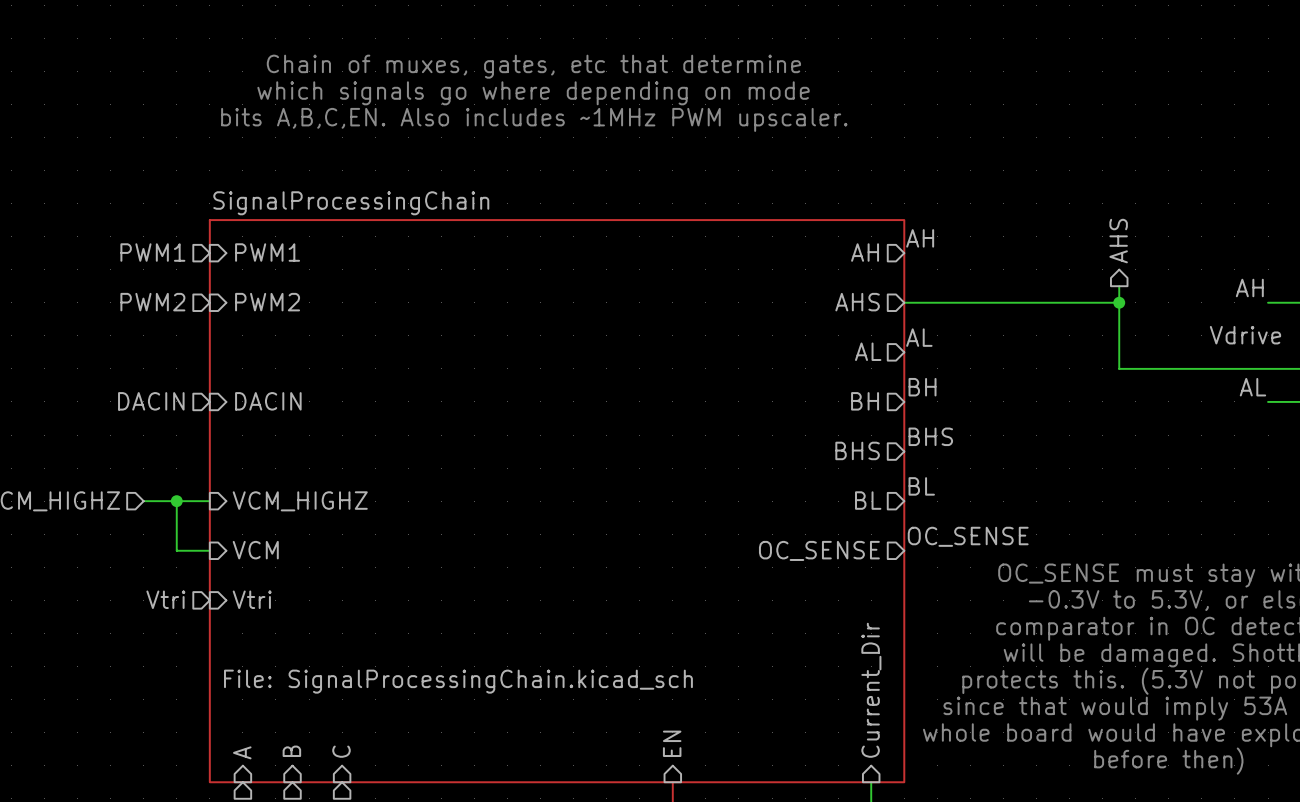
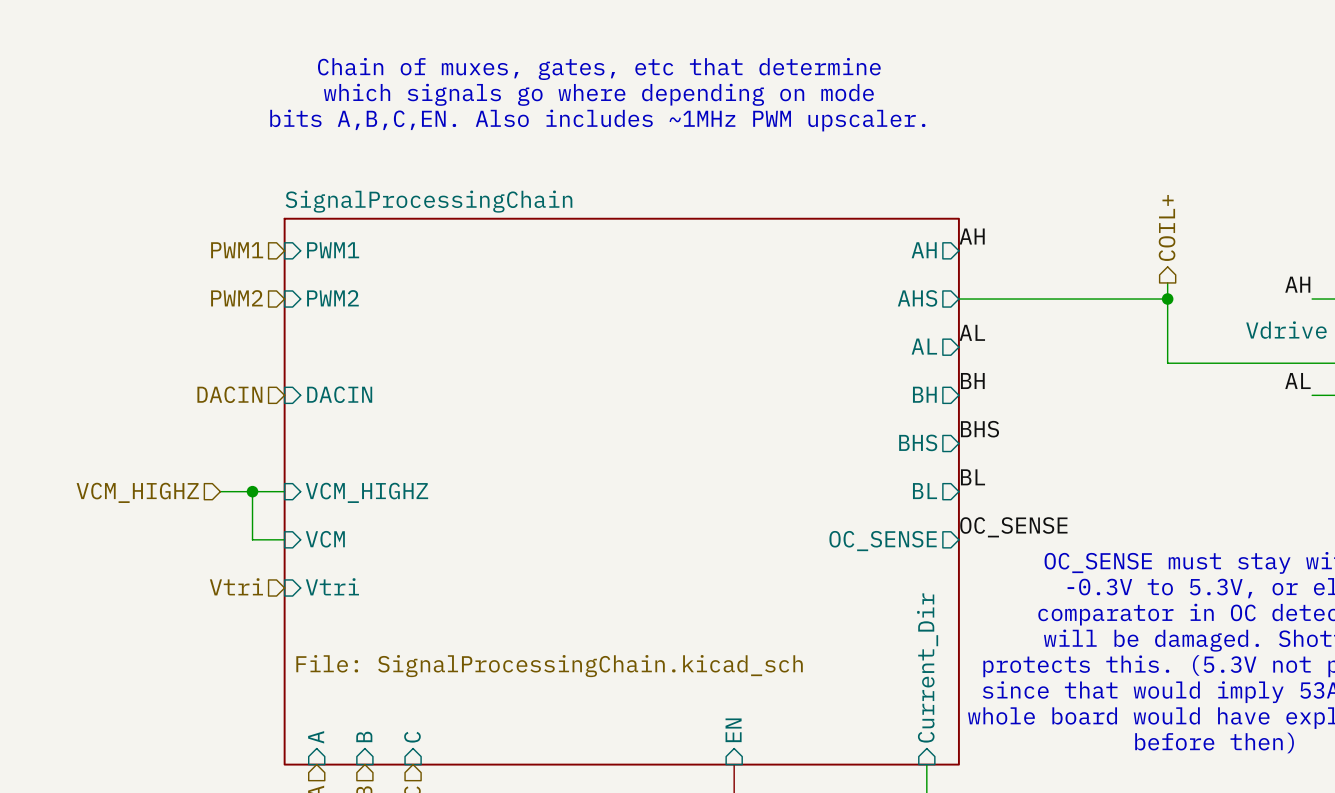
hierarchical label: AHS (1118, 241) -> COIL+ (1167, 227)

